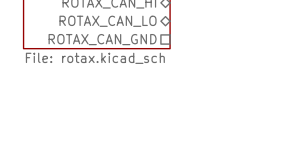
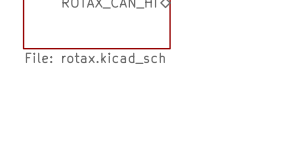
sheet pin: ROTAX_CAN_LO (108, 21) -> none
sheet pin: ROTAX_CAN_GND (102, 39) -> none

